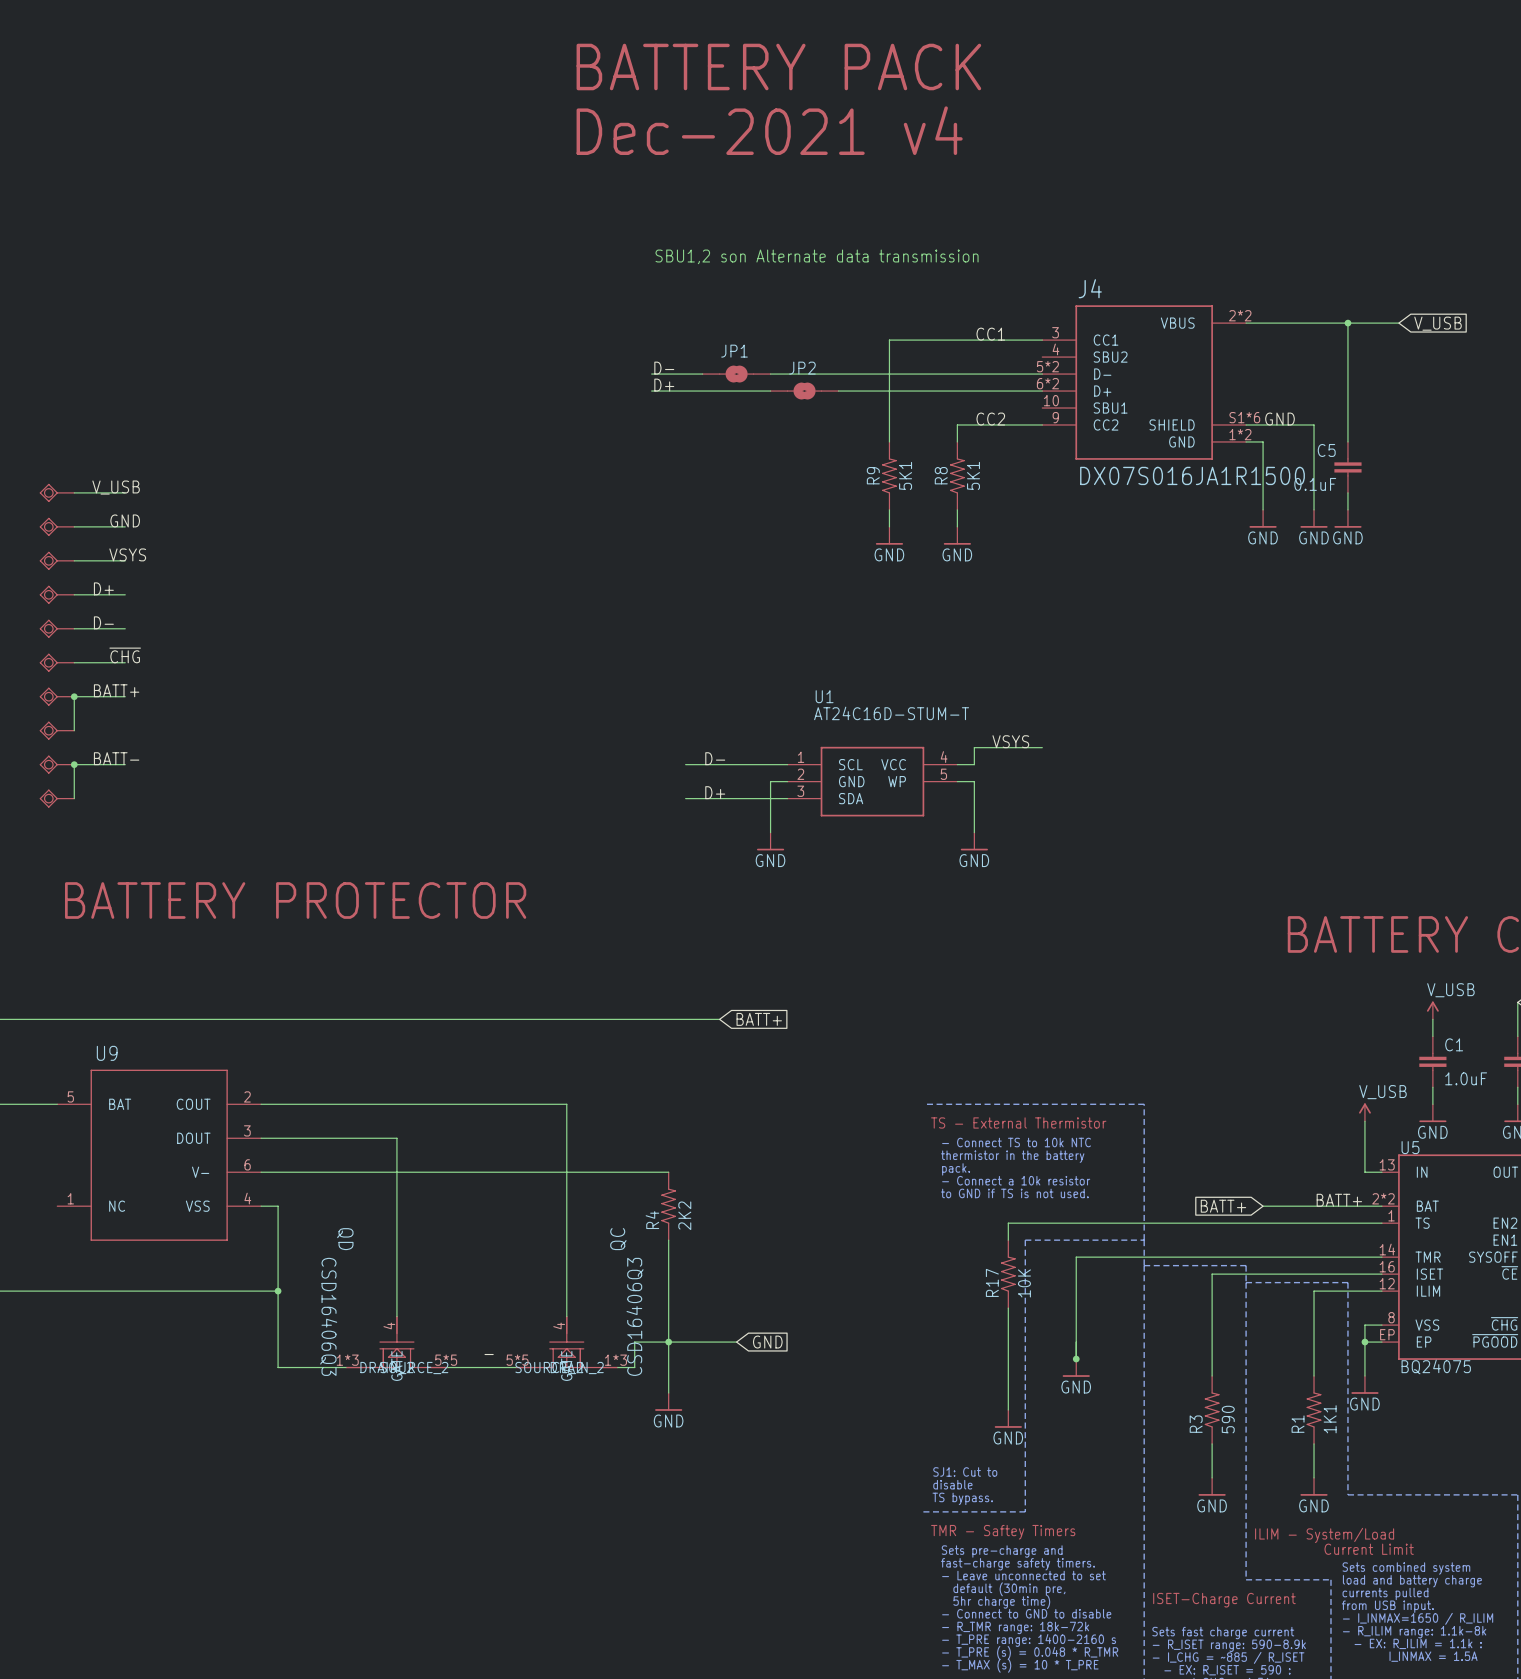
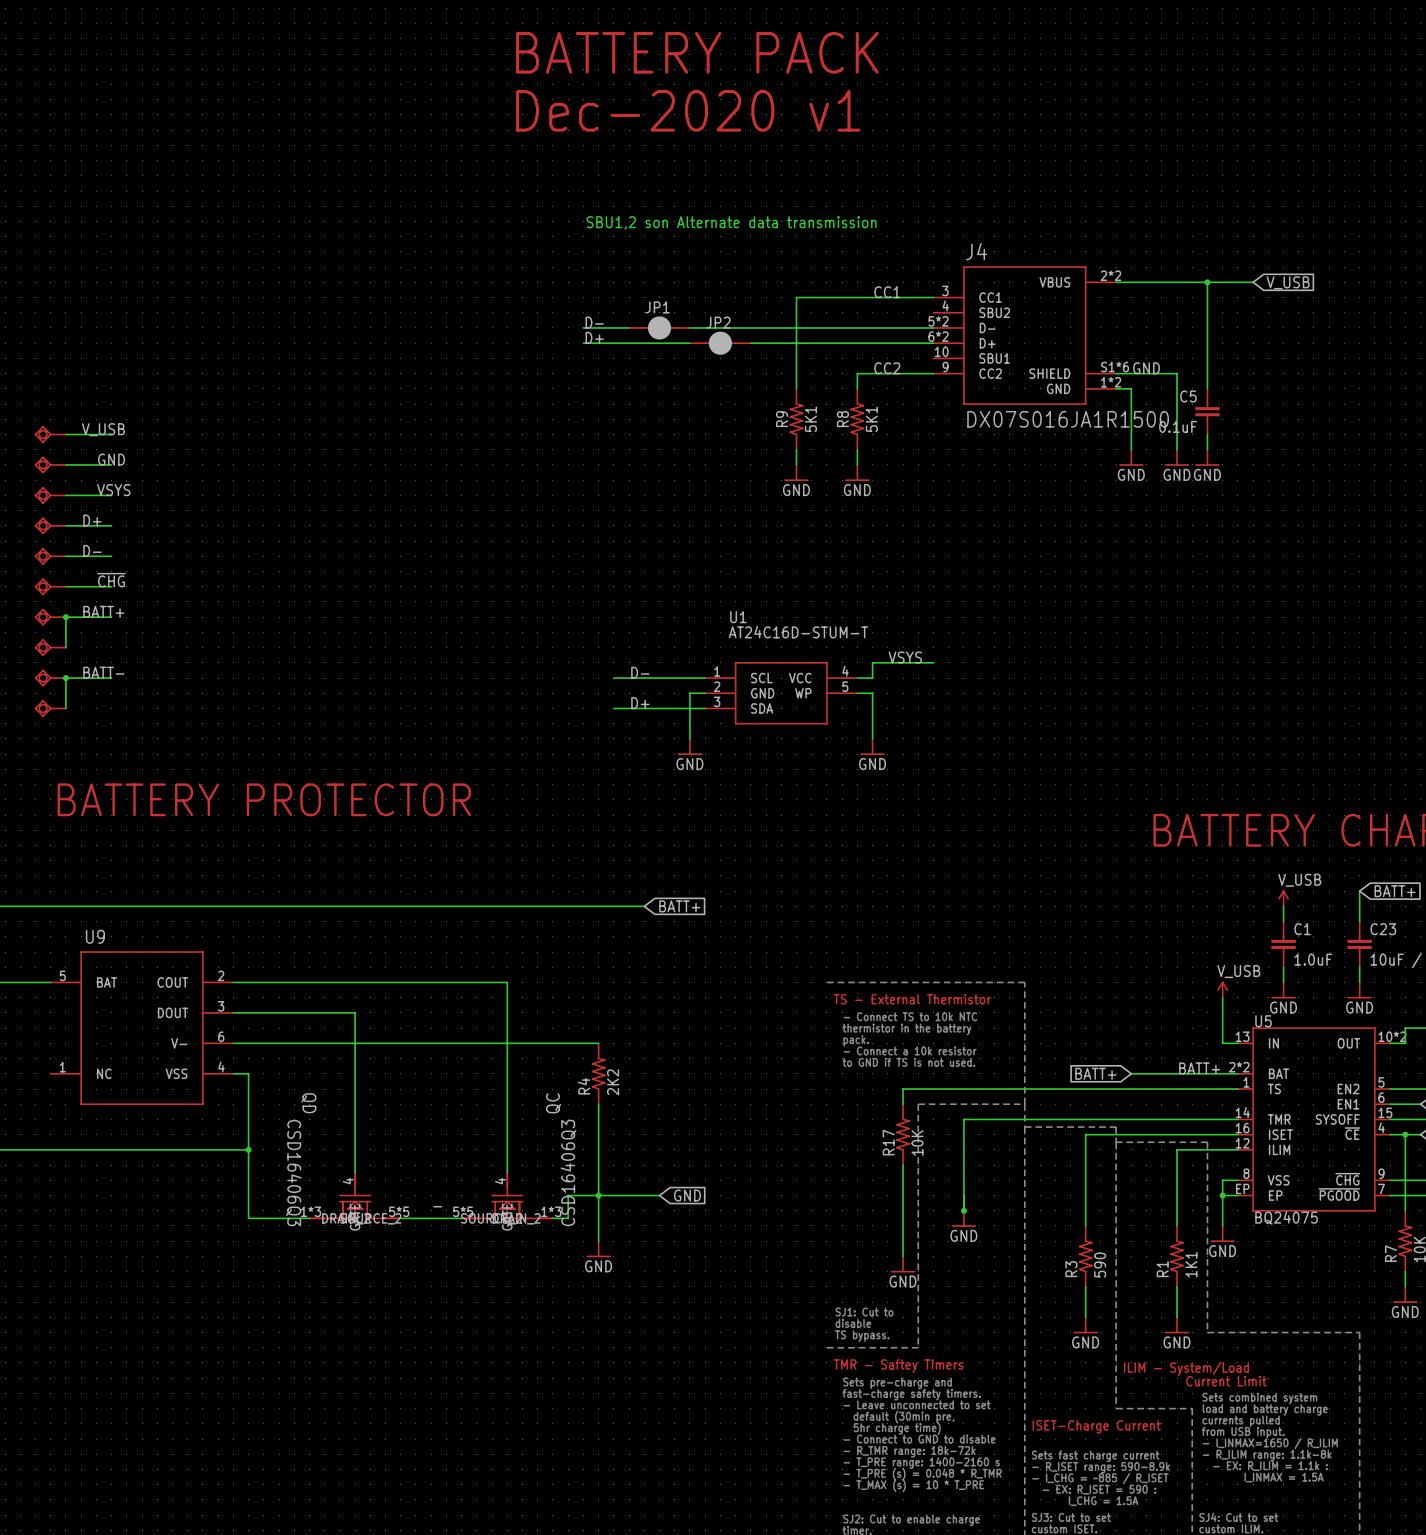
text: Dec-2021 v4 (769, 130) -> Dec-2020 v1 (688, 110)
JP1 symbol: [702, 365, 771, 383] -> [629, 316, 690, 340]
JP2 symbol: [770, 382, 839, 400] -> [689, 331, 751, 355]

